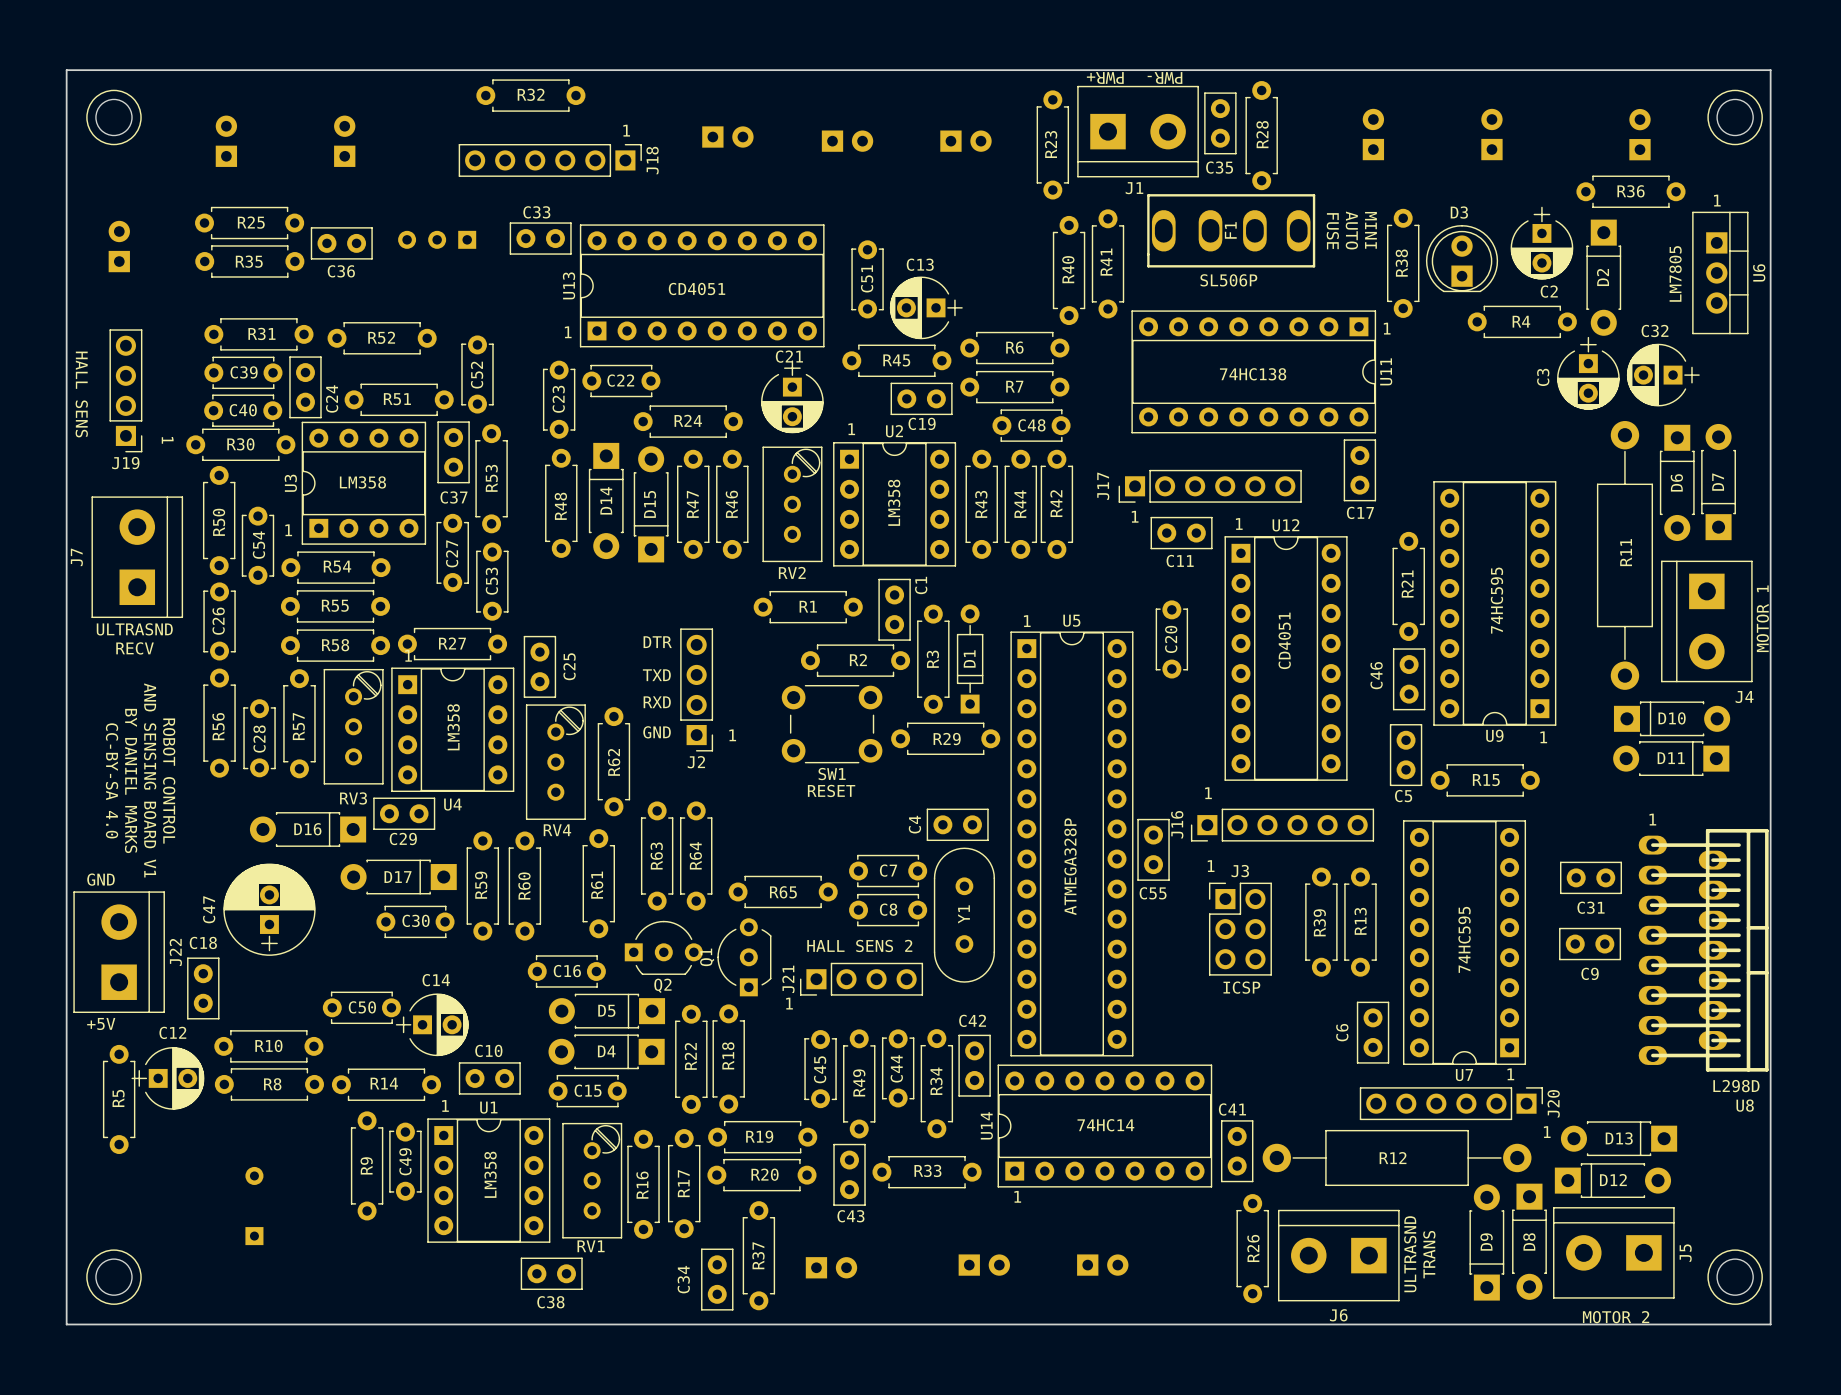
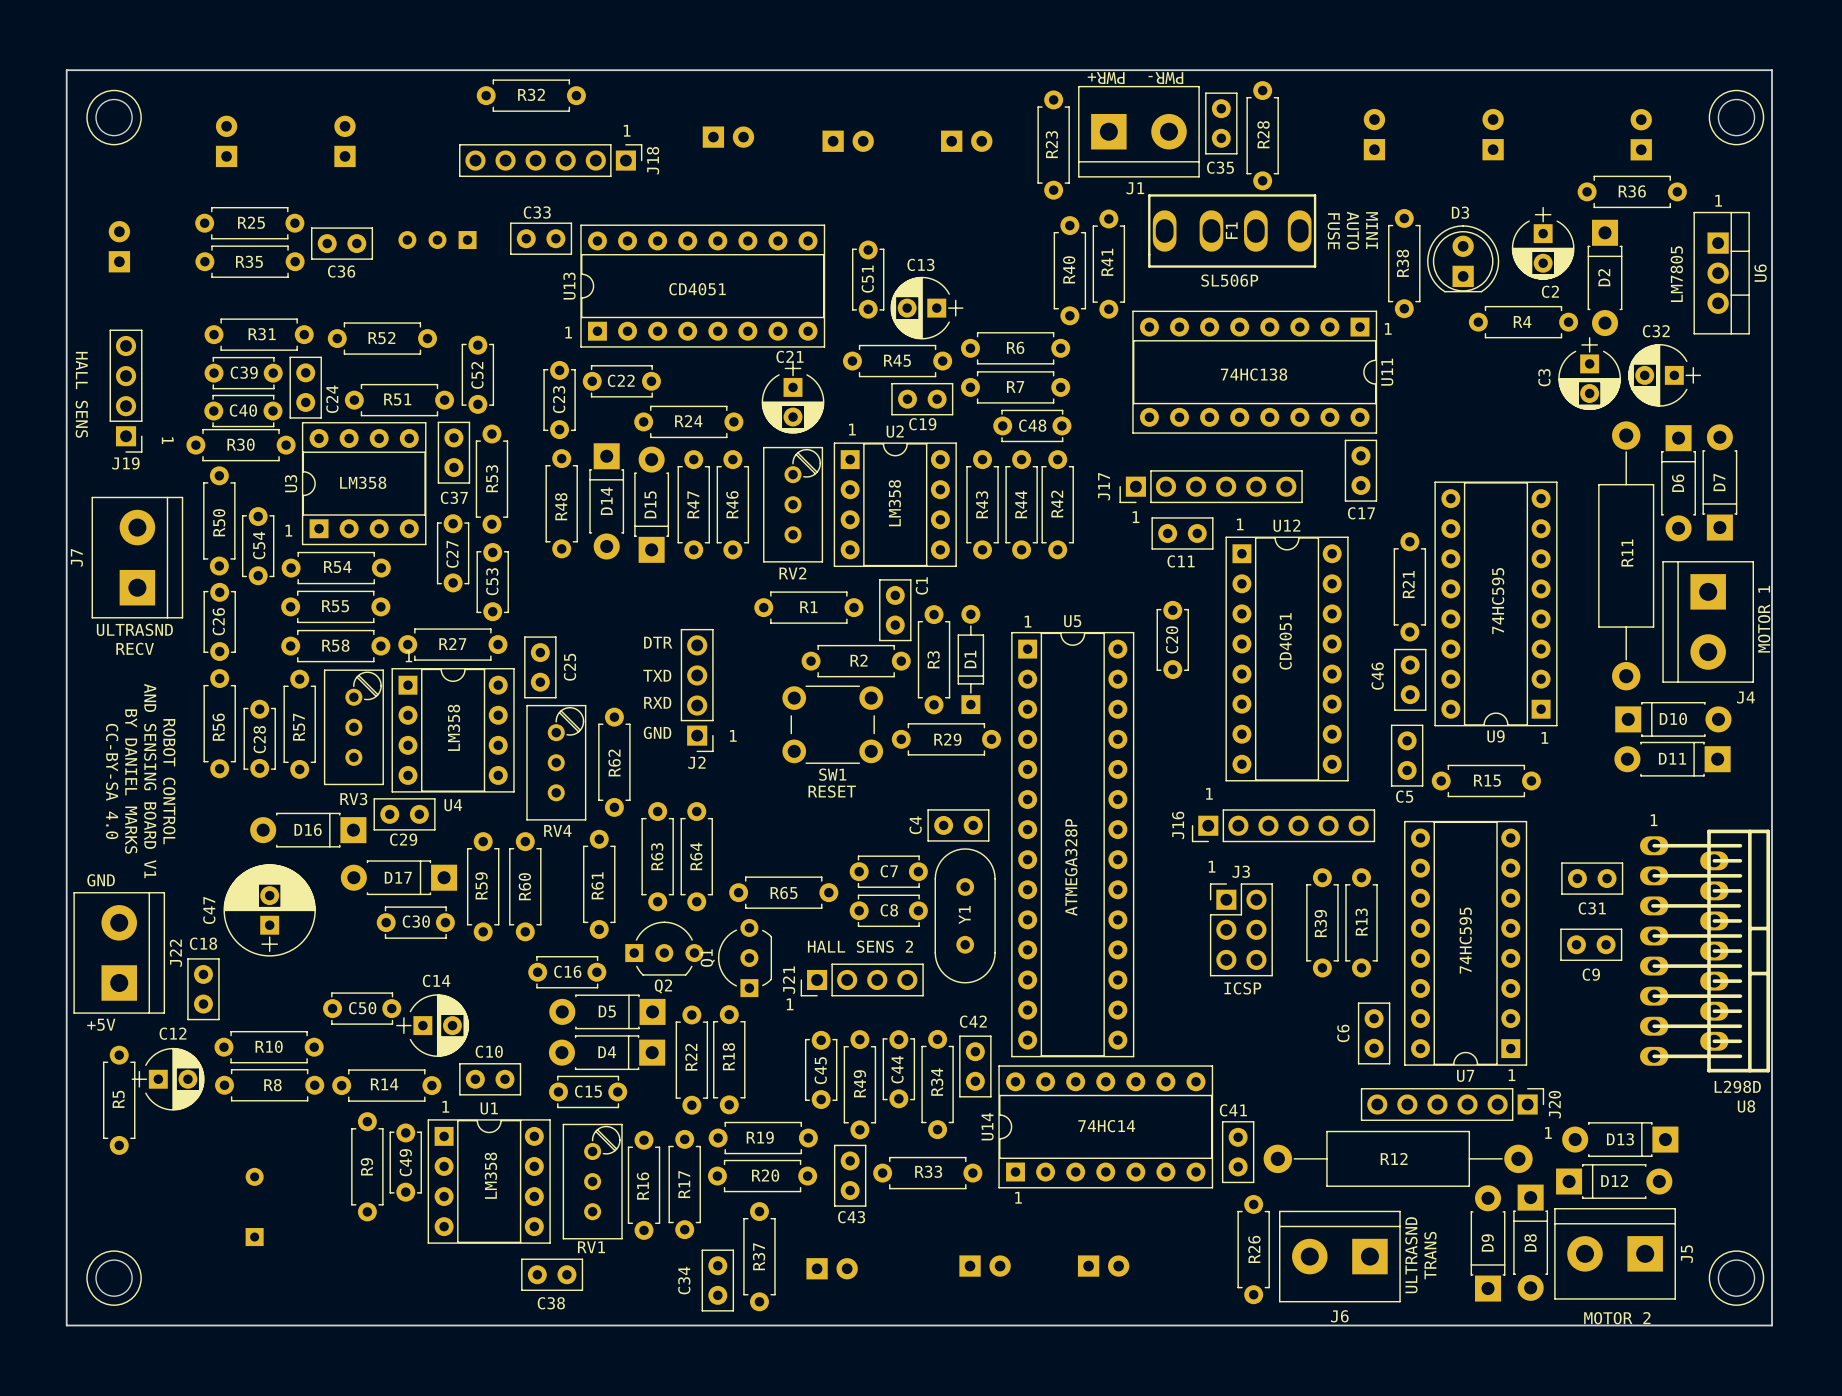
C55: (1153, 849) -> none

